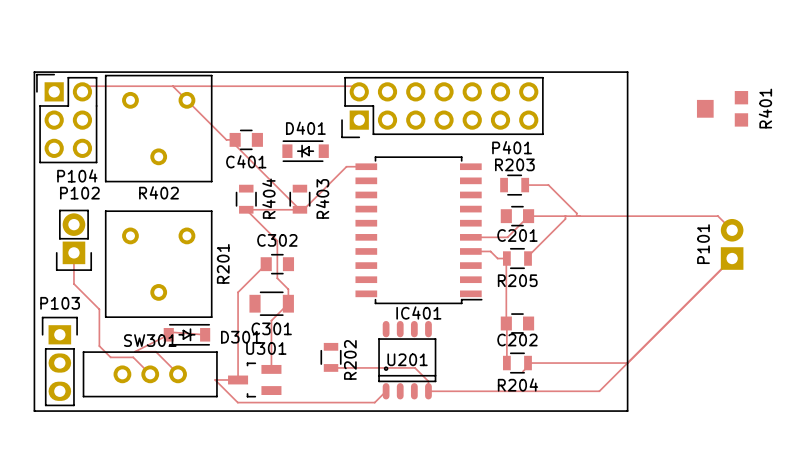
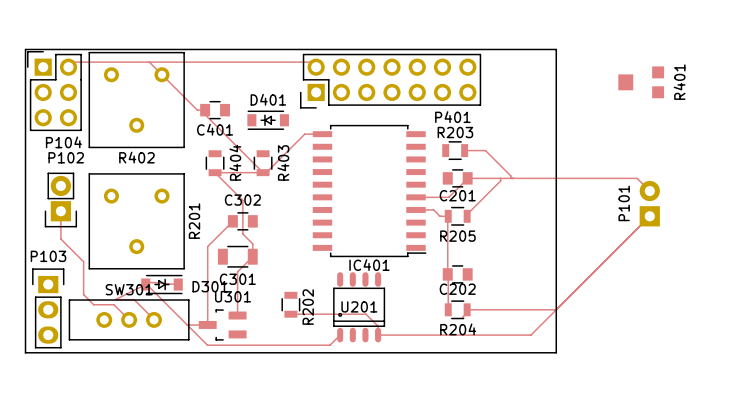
top track: none -> (144, 282) (187, 324)

